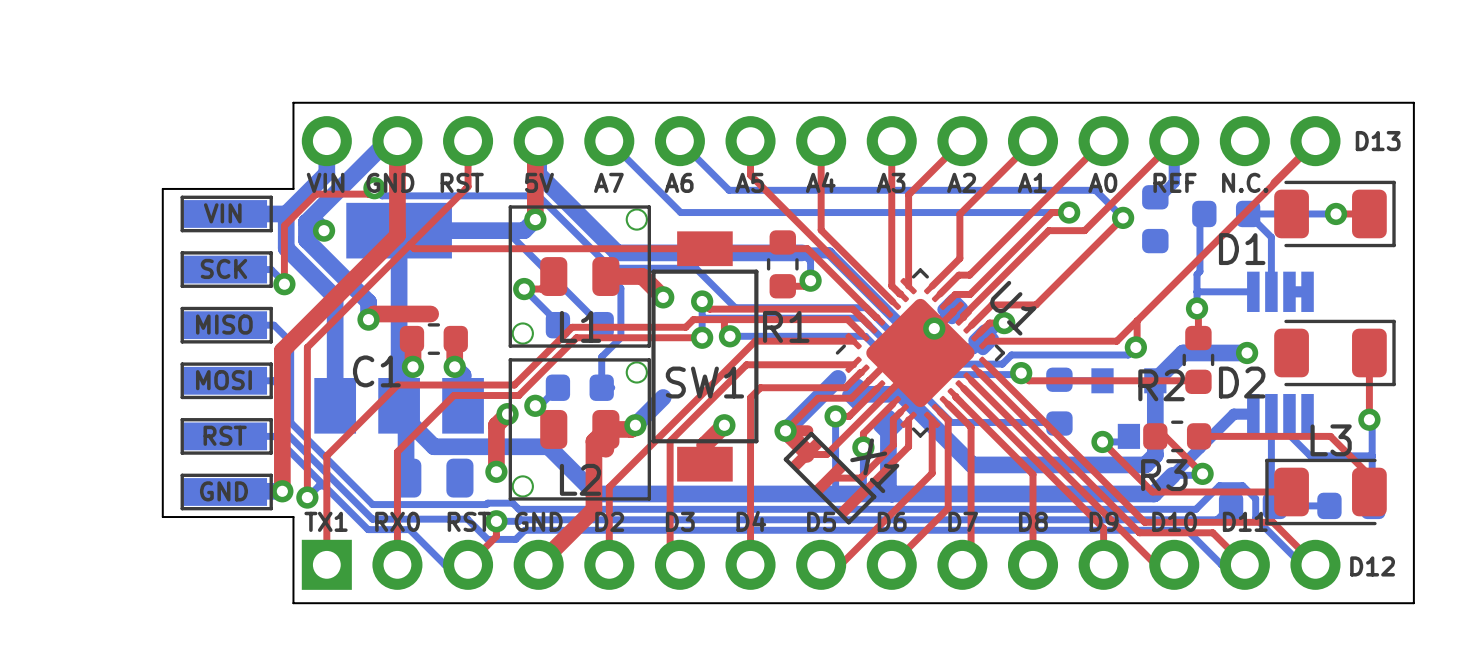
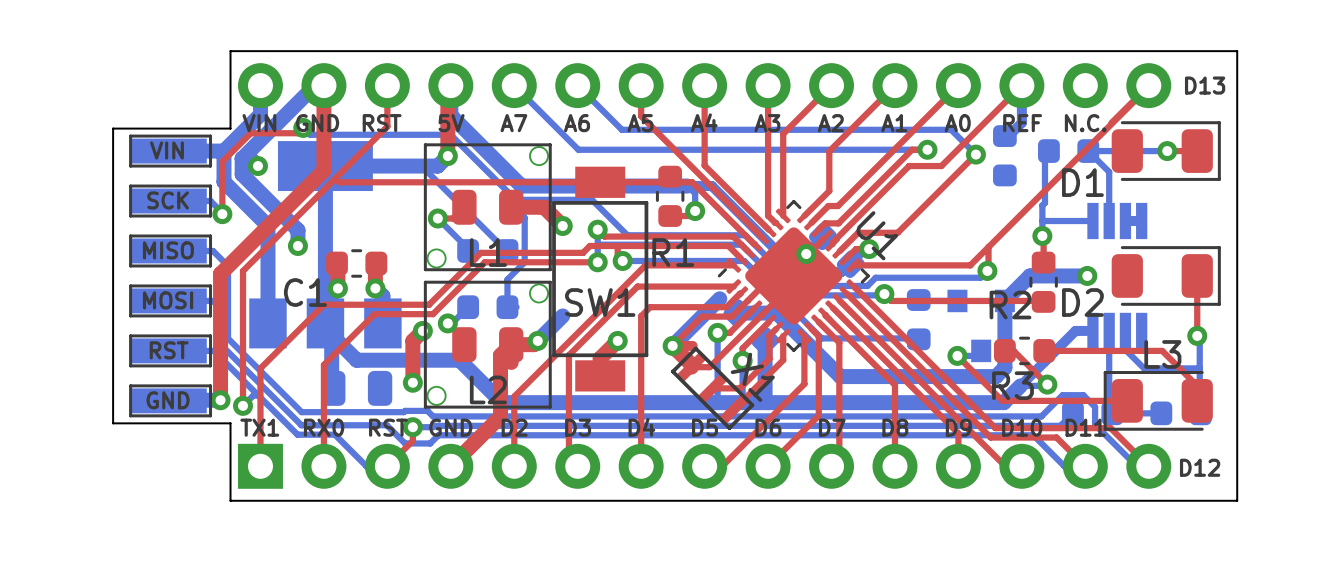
top track: (430, 314) (374, 314) (368, 319) -> none

